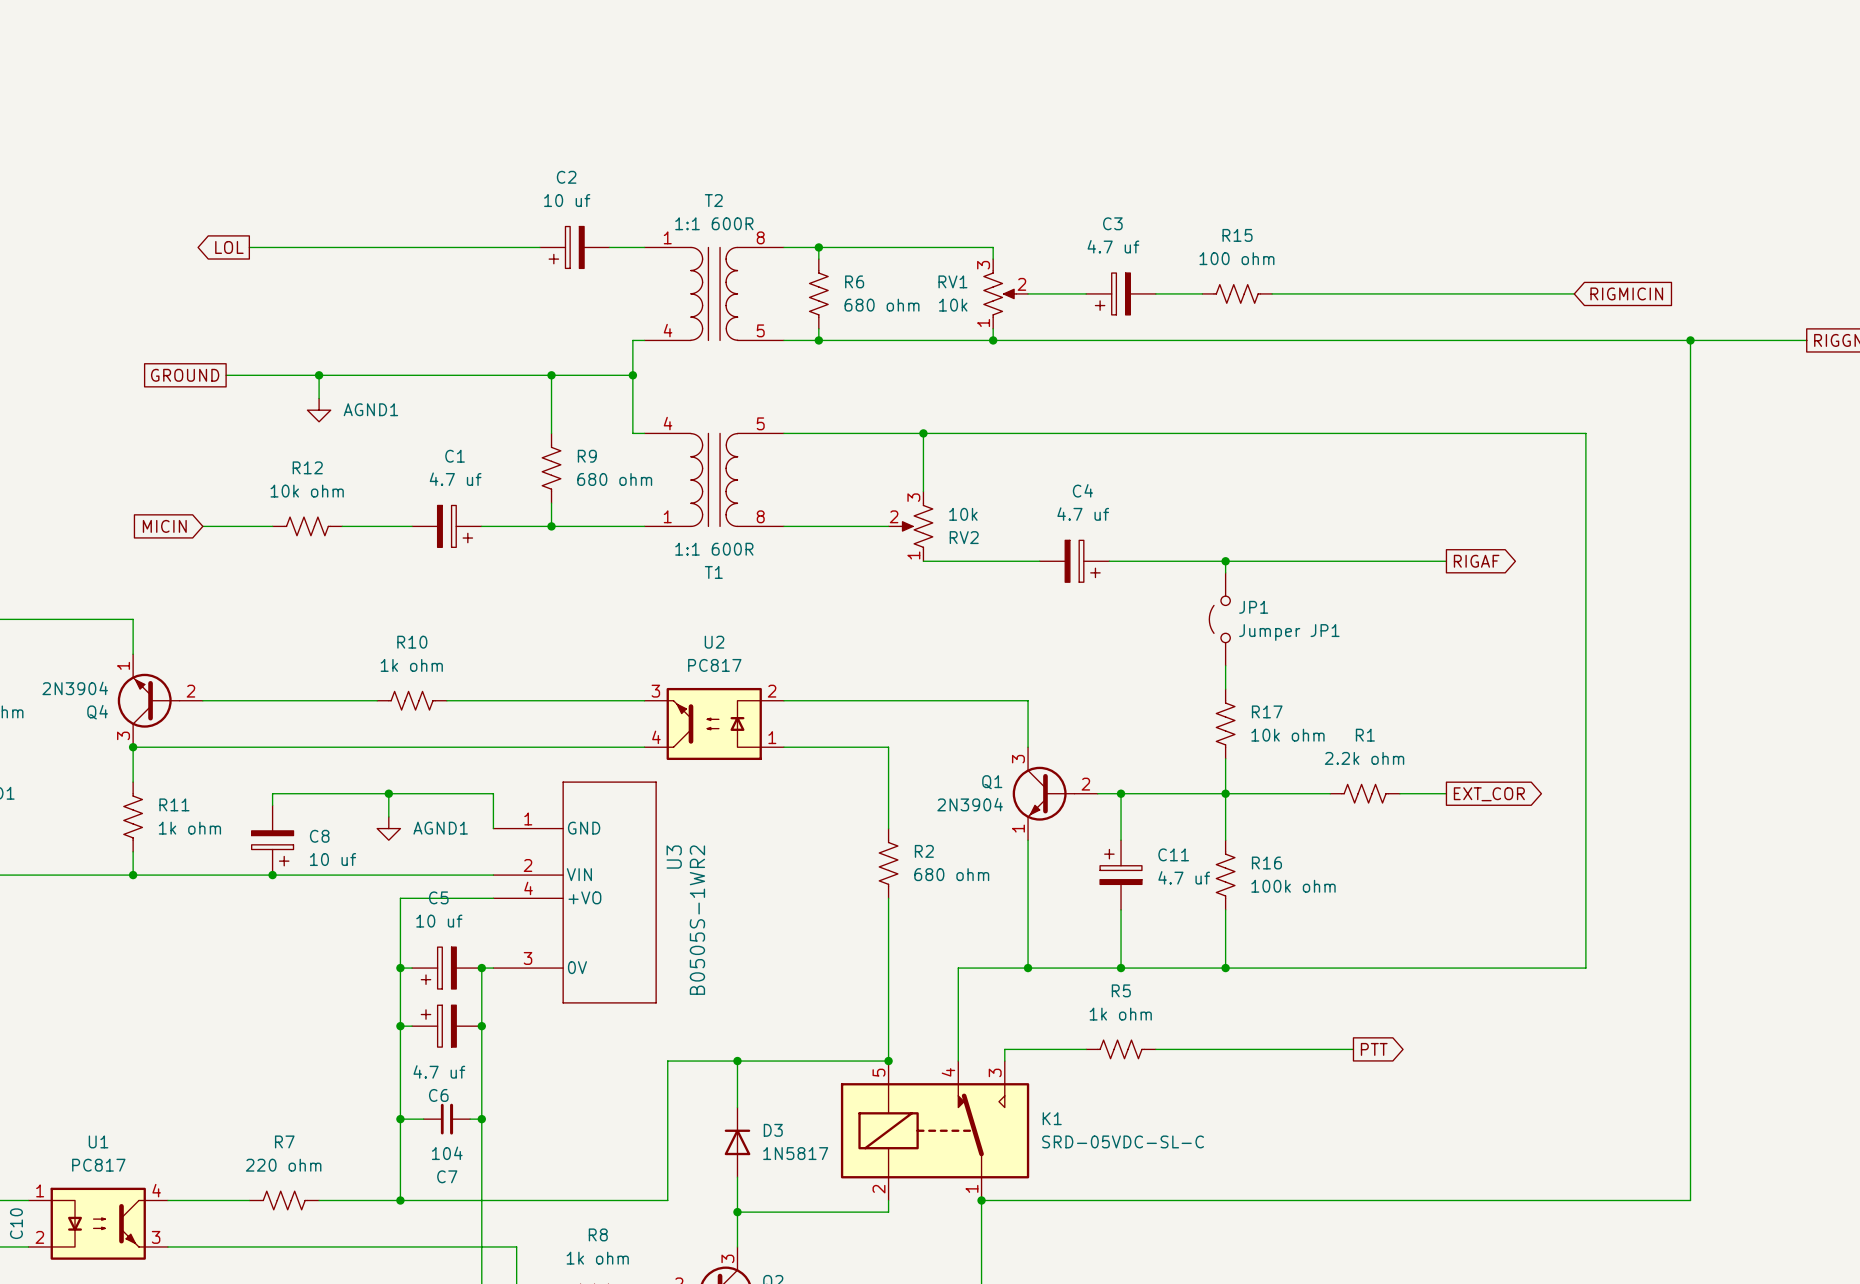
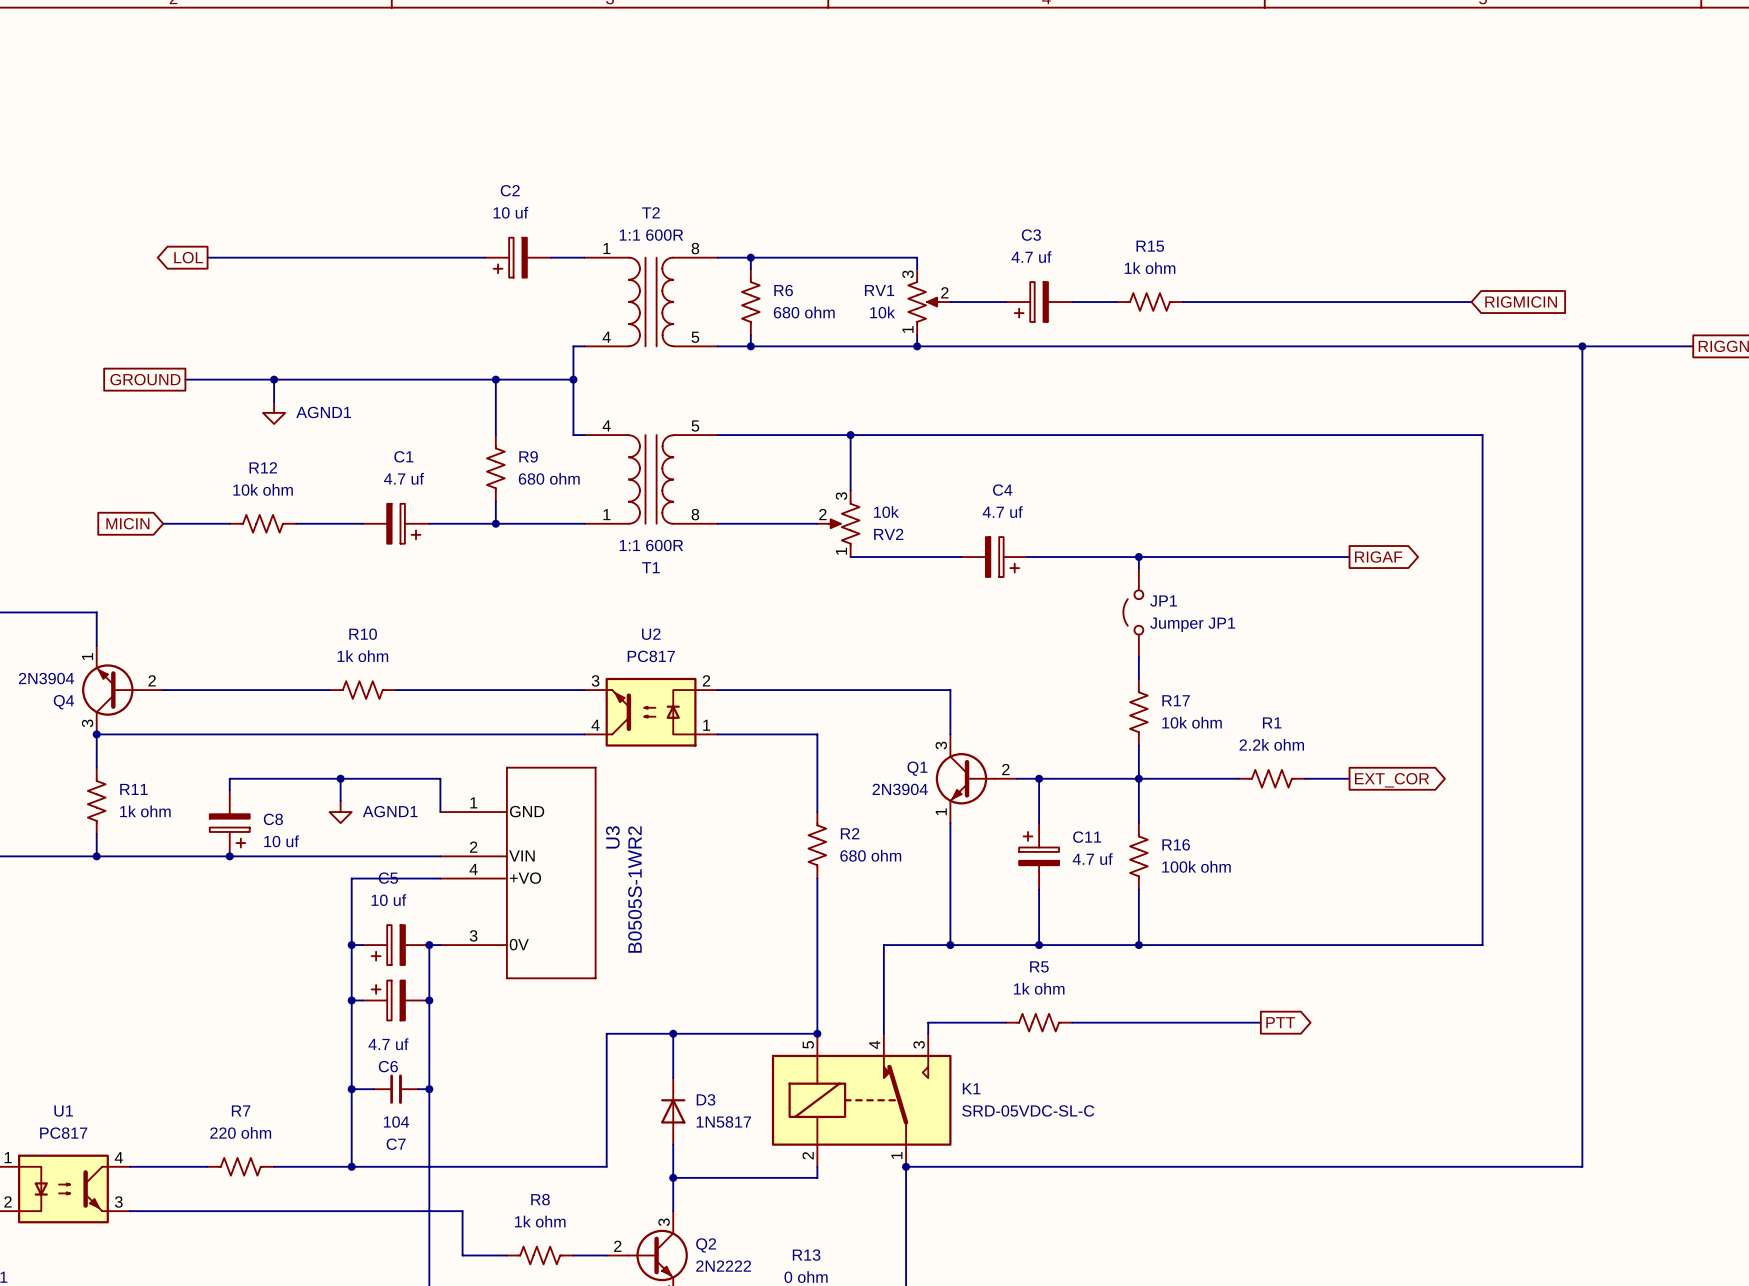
R15 value: 100 ohm (1236, 258) -> 1k ohm (1150, 268)

